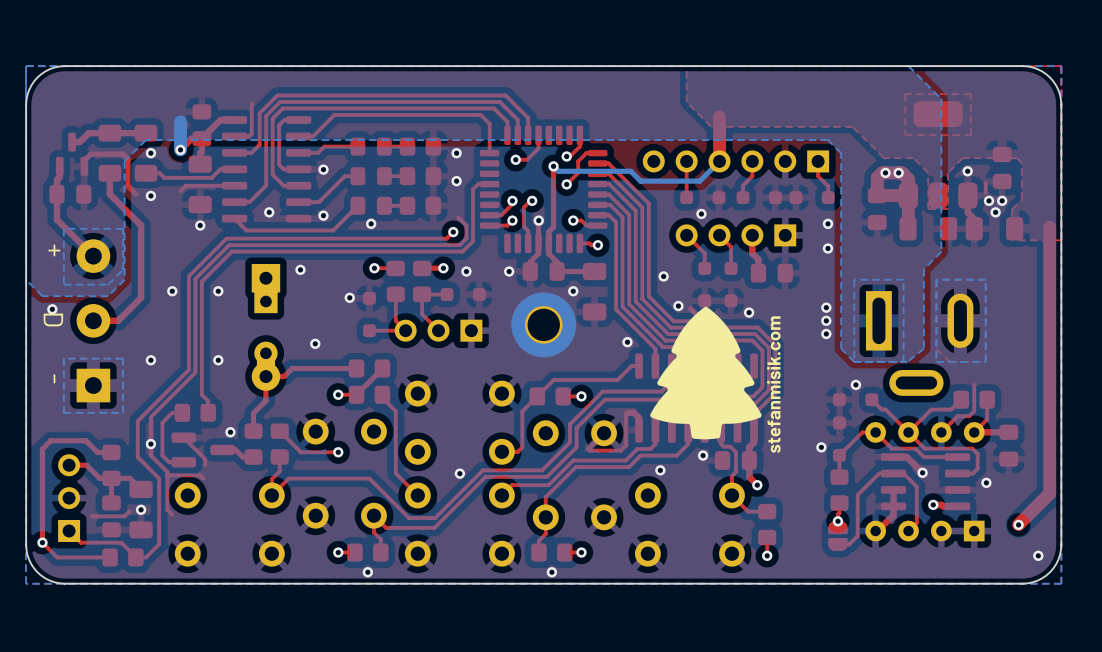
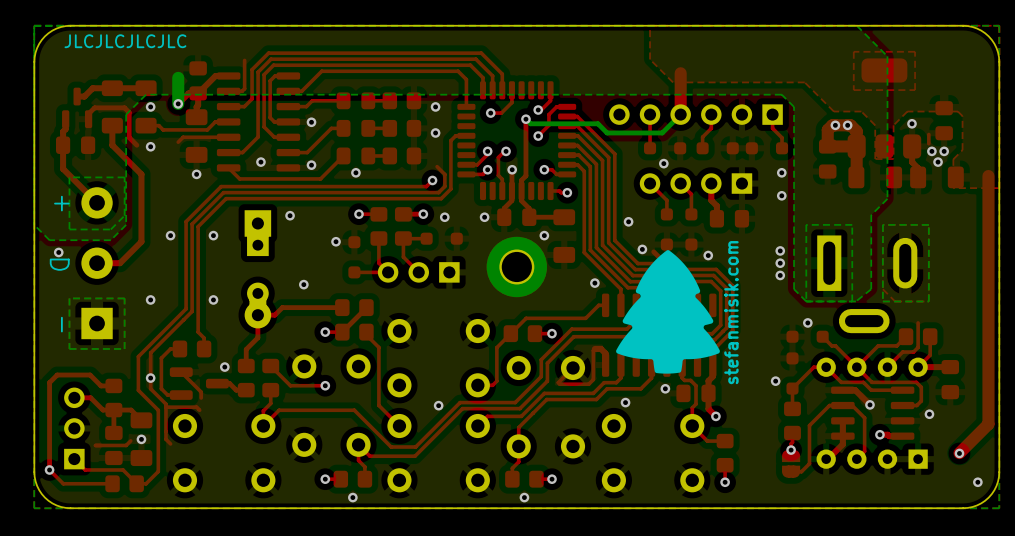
text: none -> JLCJLCJLCJLC (125, 41)

